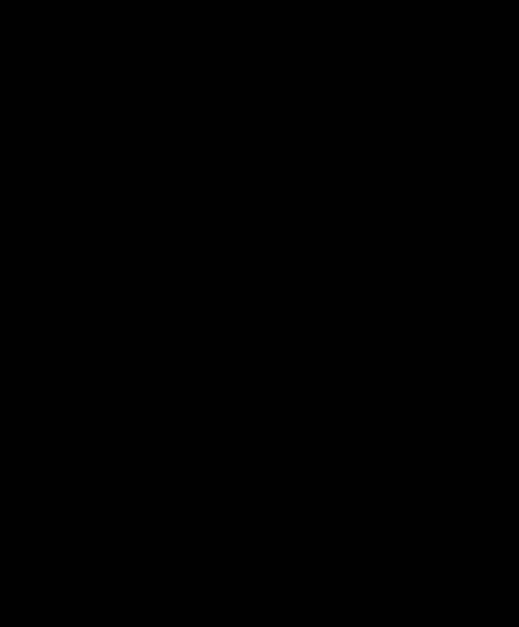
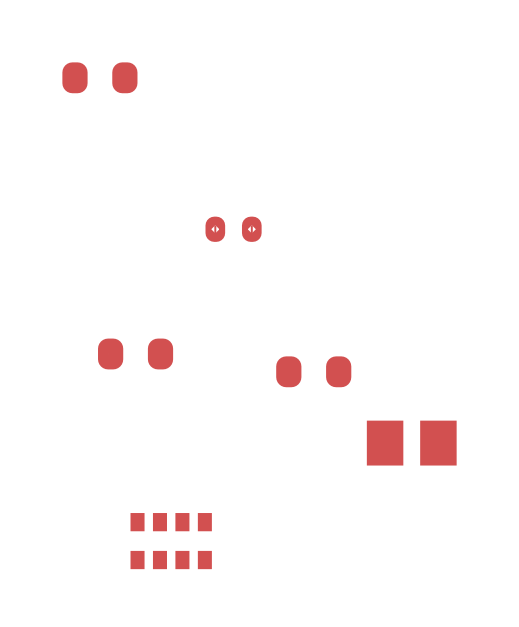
part: none -> (99, 77)
part: none -> (233, 229)
part: none -> (135, 353)
part: none -> (313, 371)
part: none -> (411, 443)
part: none -> (171, 541)

